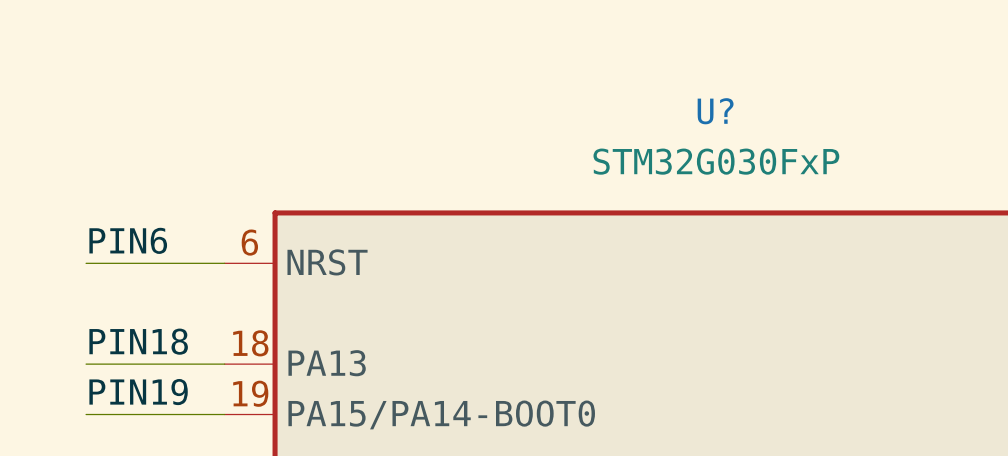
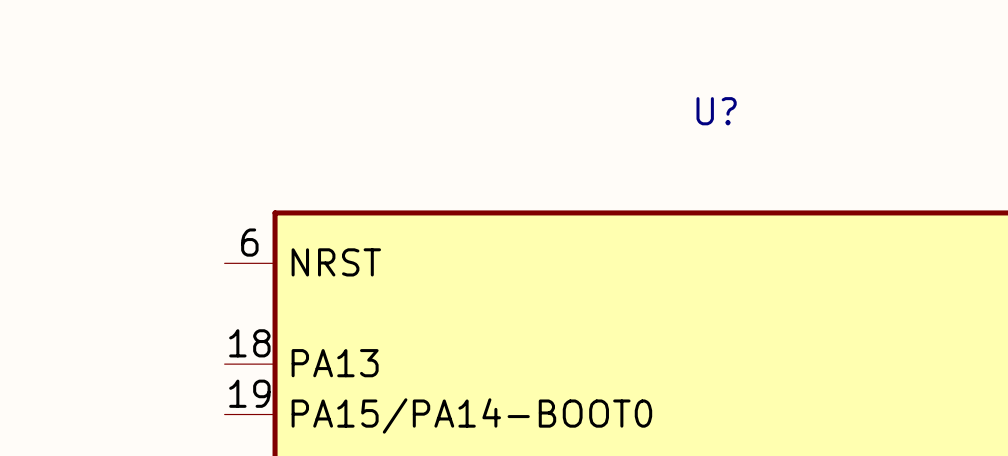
U? value: STM32G030FxP (716, 161) -> none
label: PIN6 (128, 240) -> none
wire: (86, 263) (224, 263) -> none
label: PIN18 (138, 341) -> none
wire: (86, 364) (224, 364) -> none
label: PIN19 (138, 392) -> none
wire: (86, 414) (224, 414) -> none

